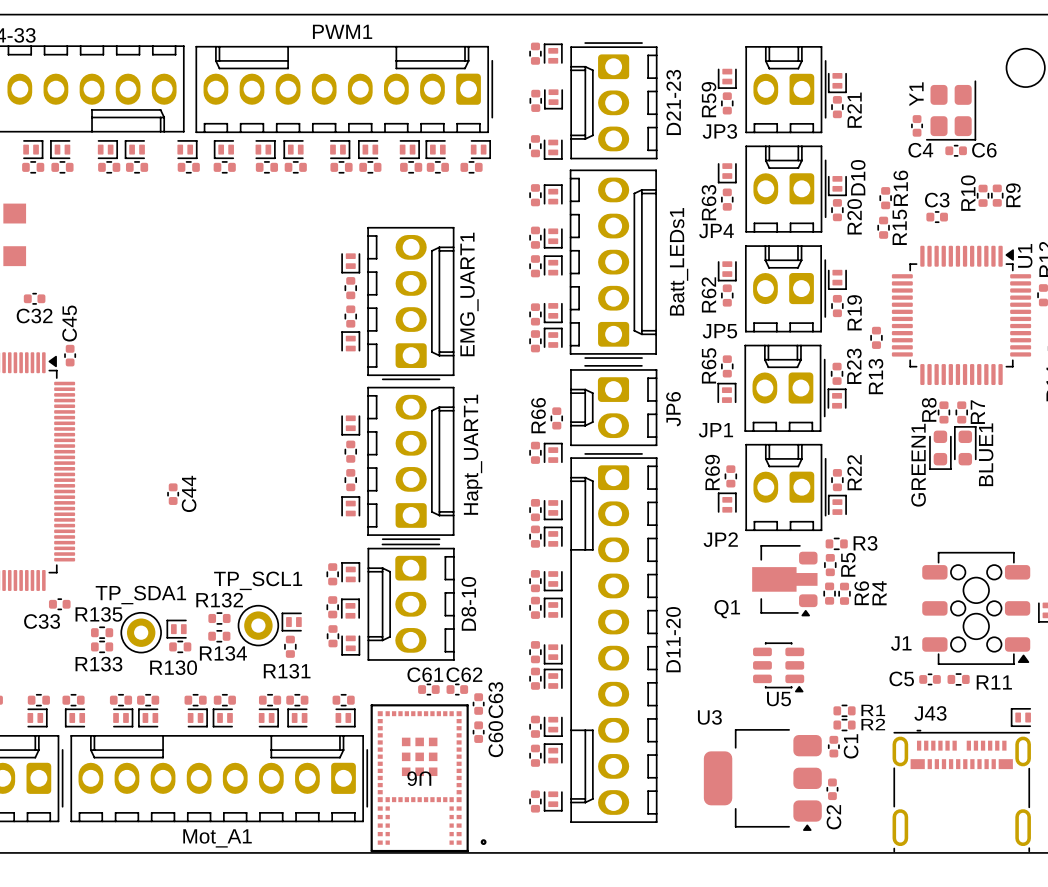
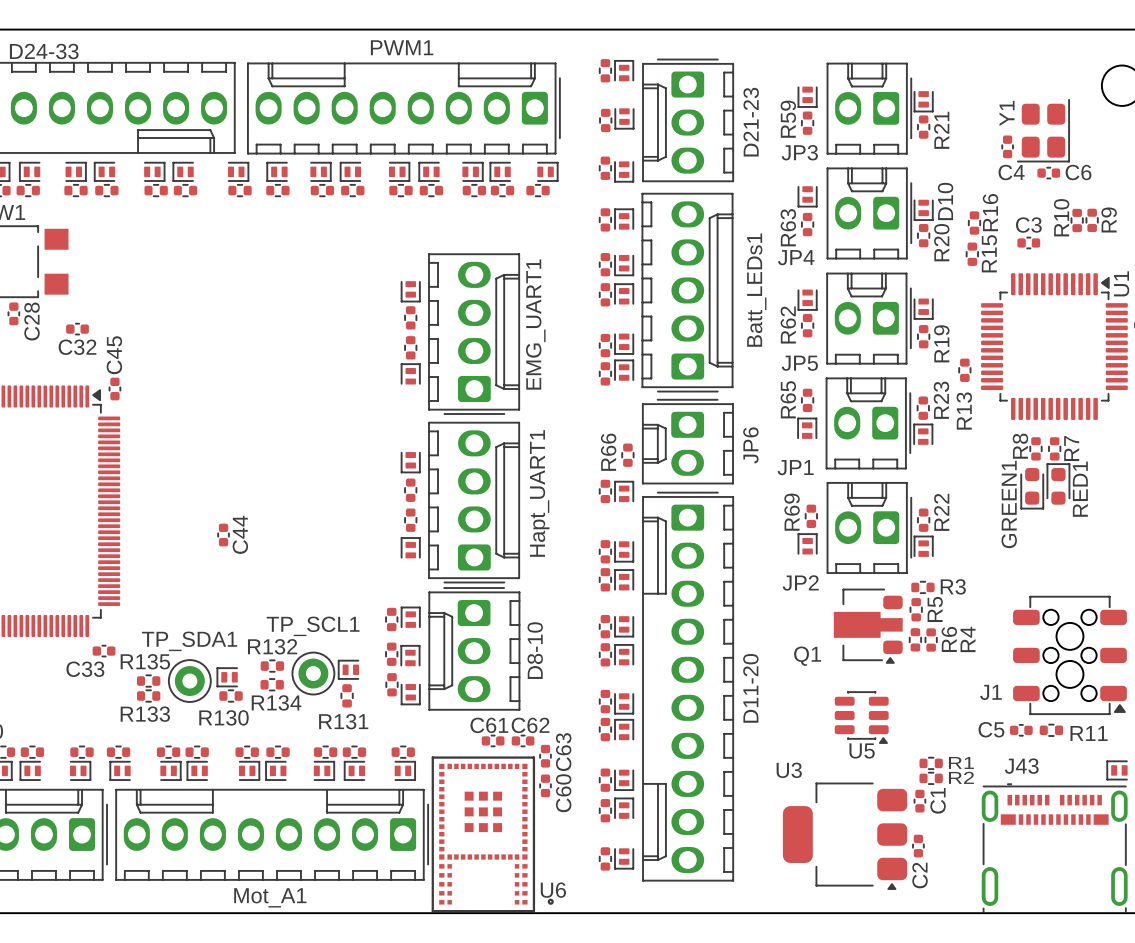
BLUE1 name: BLUE1 (986, 454) -> RED1 (1080, 489)
U6 name rotation: 0° (419, 778) -> 180° (553, 890)
U6 name position: U6 (419, 778) -> U6 (553, 890)

